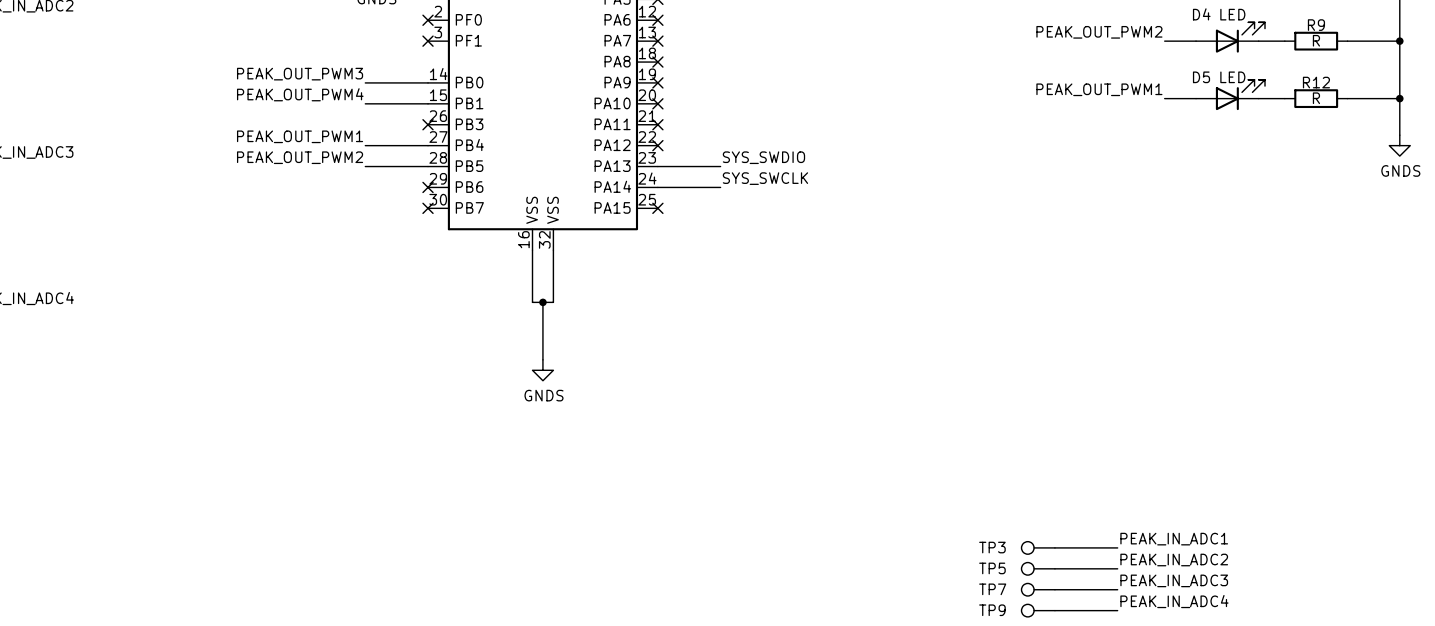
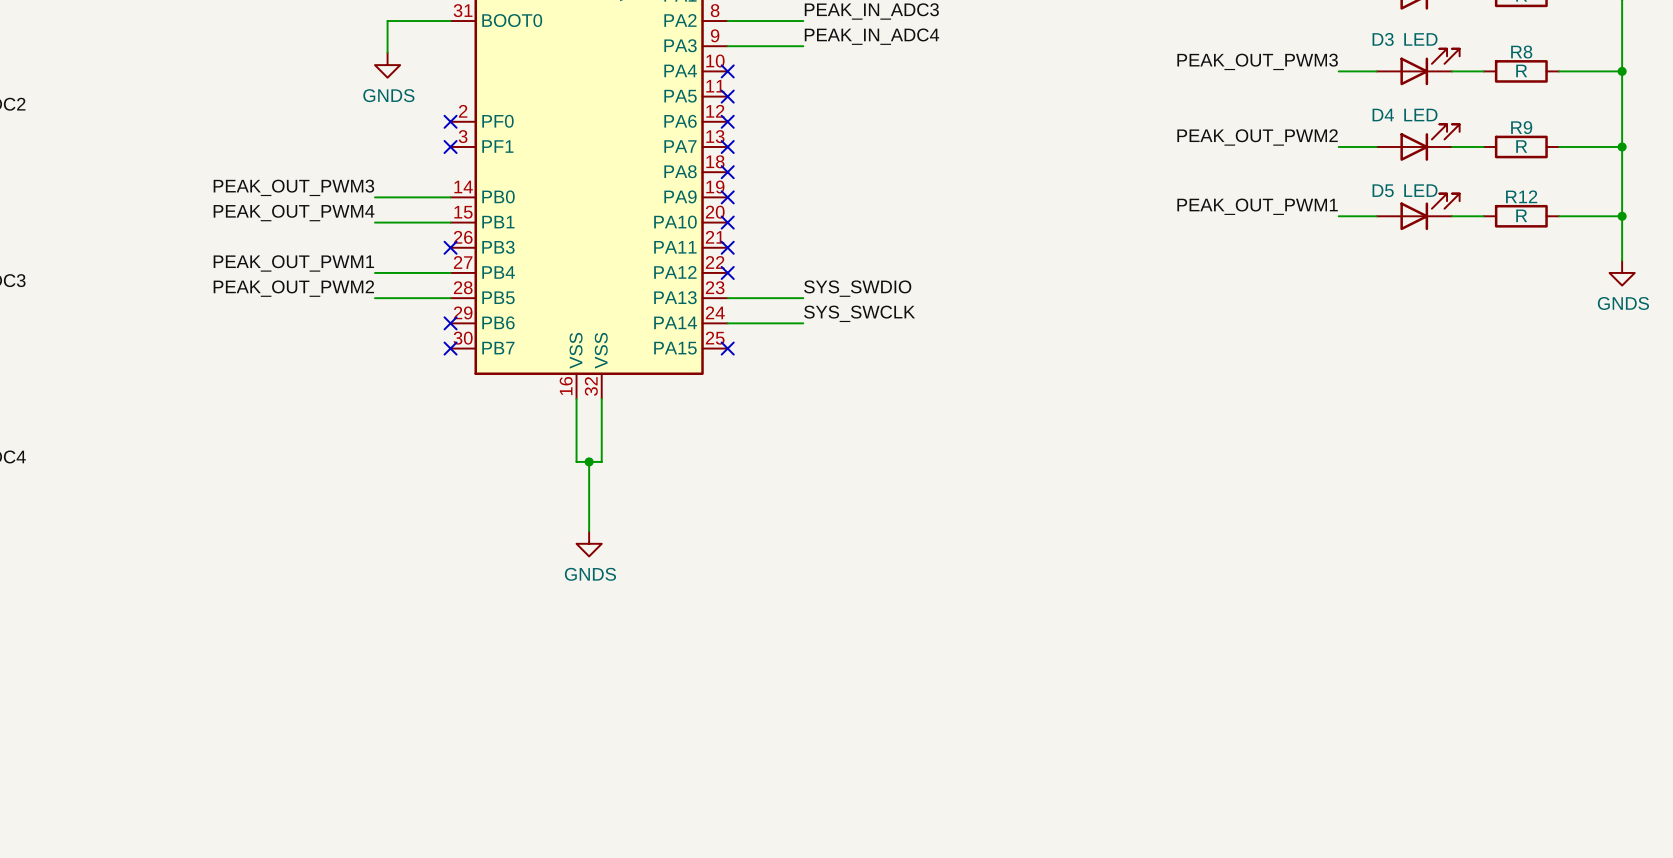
label: PEAK_IN_ADC1 (1174, 539) -> none
TP3: (1038, 547) -> none
wire: (1054, 547) (1117, 547) -> none
label: PEAK_IN_ADC2 (1174, 560) -> none
TP5: (1038, 568) -> none
wire: (1054, 568) (1117, 568) -> none
label: PEAK_IN_ADC3 (1174, 580) -> none
TP7: (1038, 589) -> none
wire: (1054, 589) (1117, 589) -> none
label: PEAK_IN_ADC4 (1174, 601) -> none
TP9: (1038, 610) -> none
wire: (1054, 610) (1117, 610) -> none

